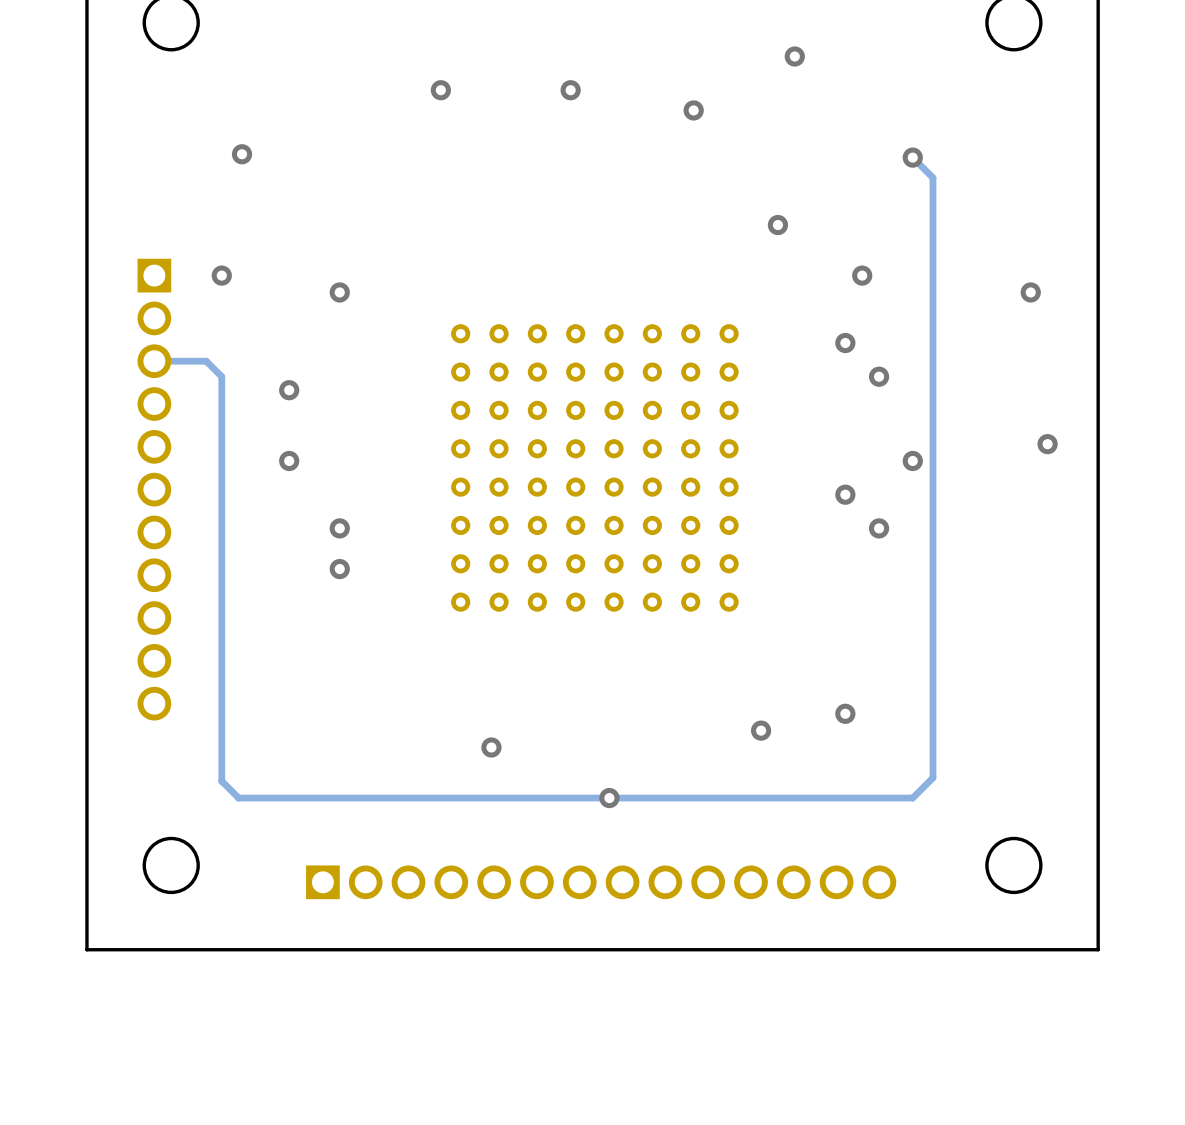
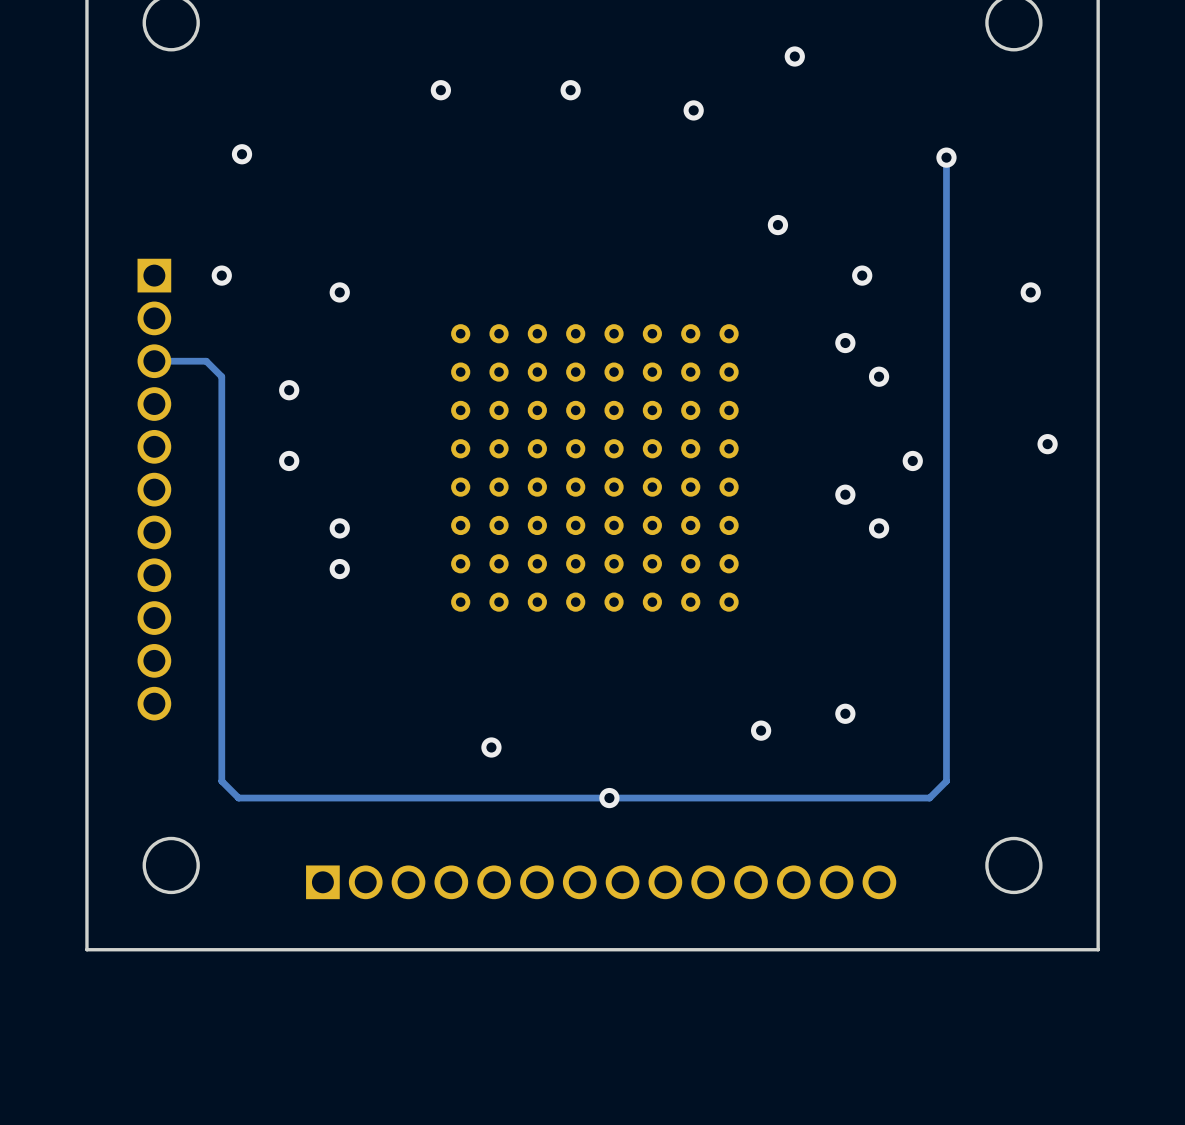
track: (912, 157) (933, 177) (933, 777) (912, 798) -> (946, 157) (946, 781) (929, 798) (912, 798)
via position: (912, 157) -> (946, 157)

